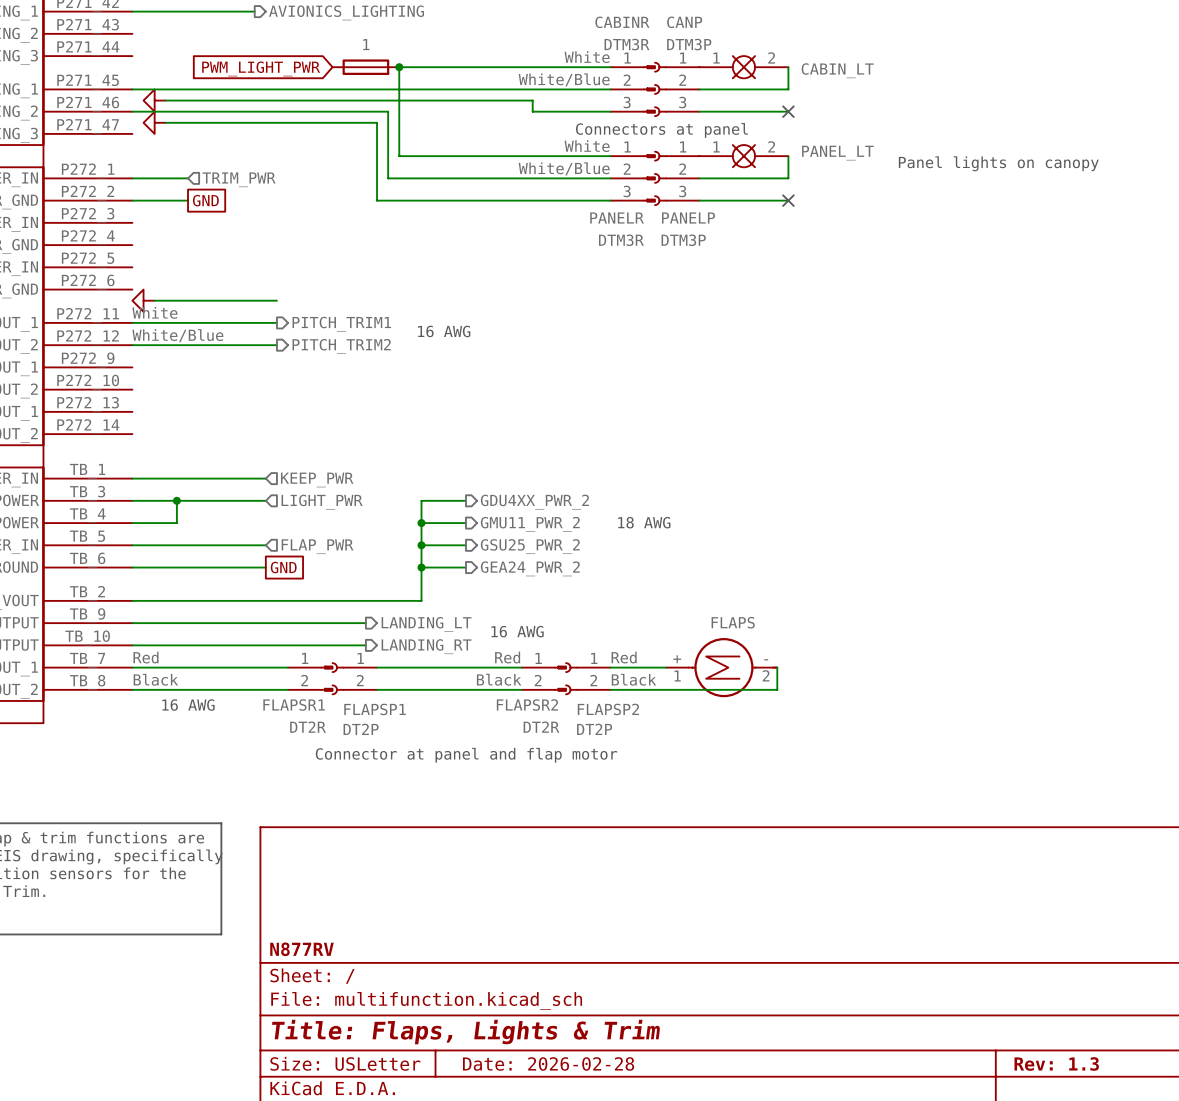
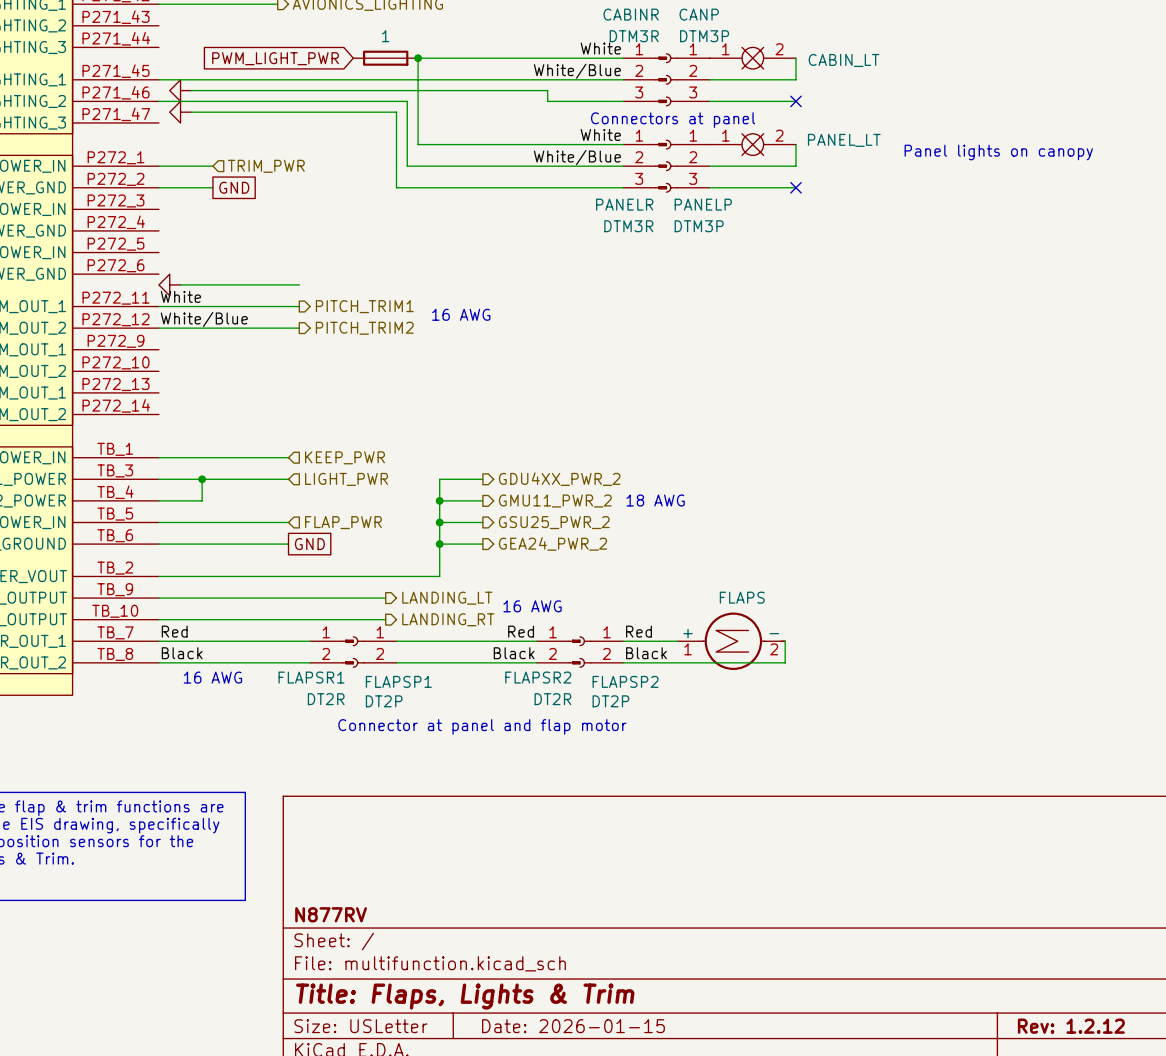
title block: Date: 2026-02-28 (548, 1063) -> Date: 2026-01-15 (573, 1026)
title block: Rev: 1.3 (1056, 1063) -> Rev: 1.2.12 (1071, 1026)

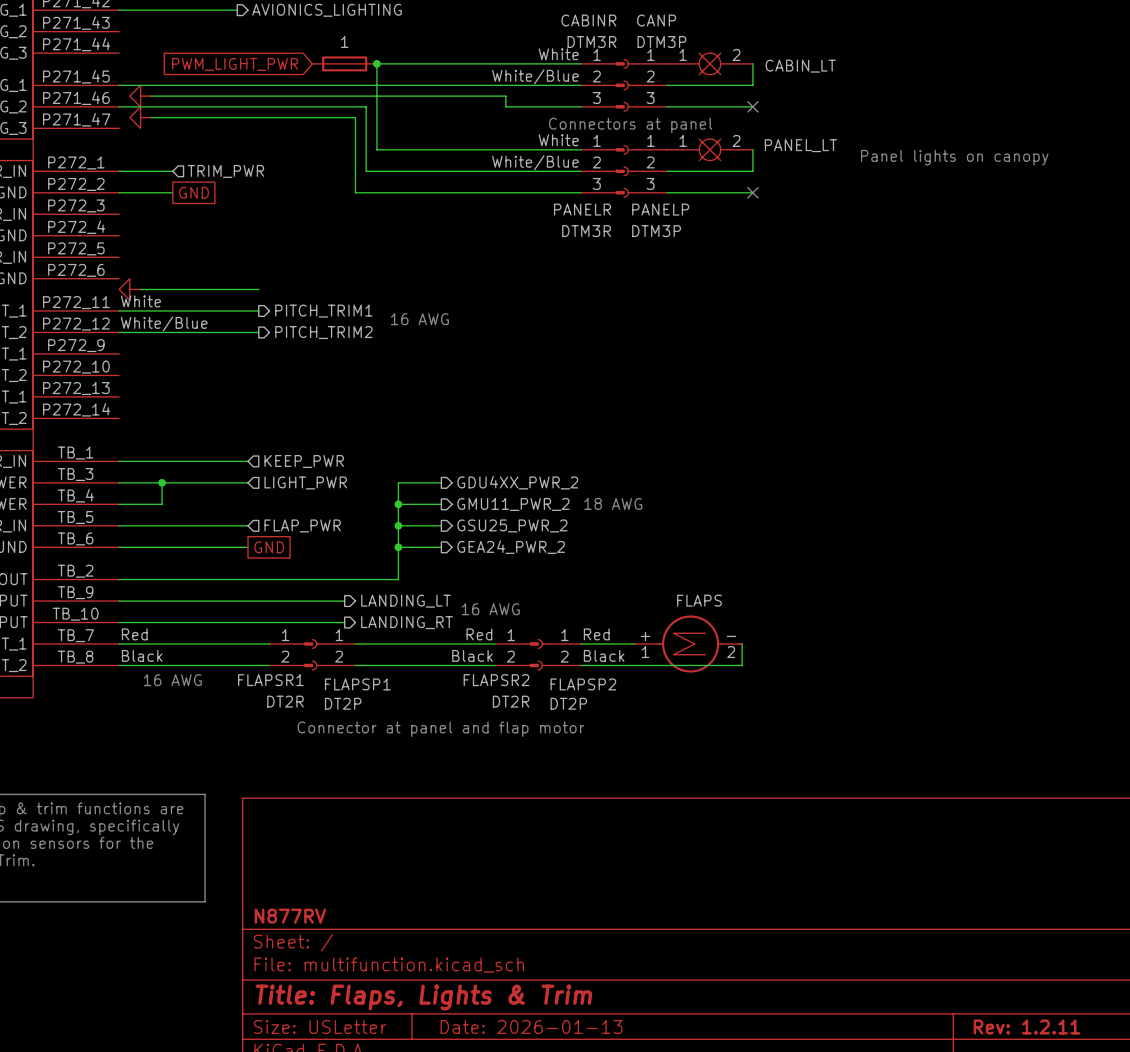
title block: Date: 2026-01-15 (573, 1026) -> Date: 2026-01-13 (531, 1026)
title block: Rev: 1.2.12 (1071, 1026) -> Rev: 1.2.11 (1026, 1026)

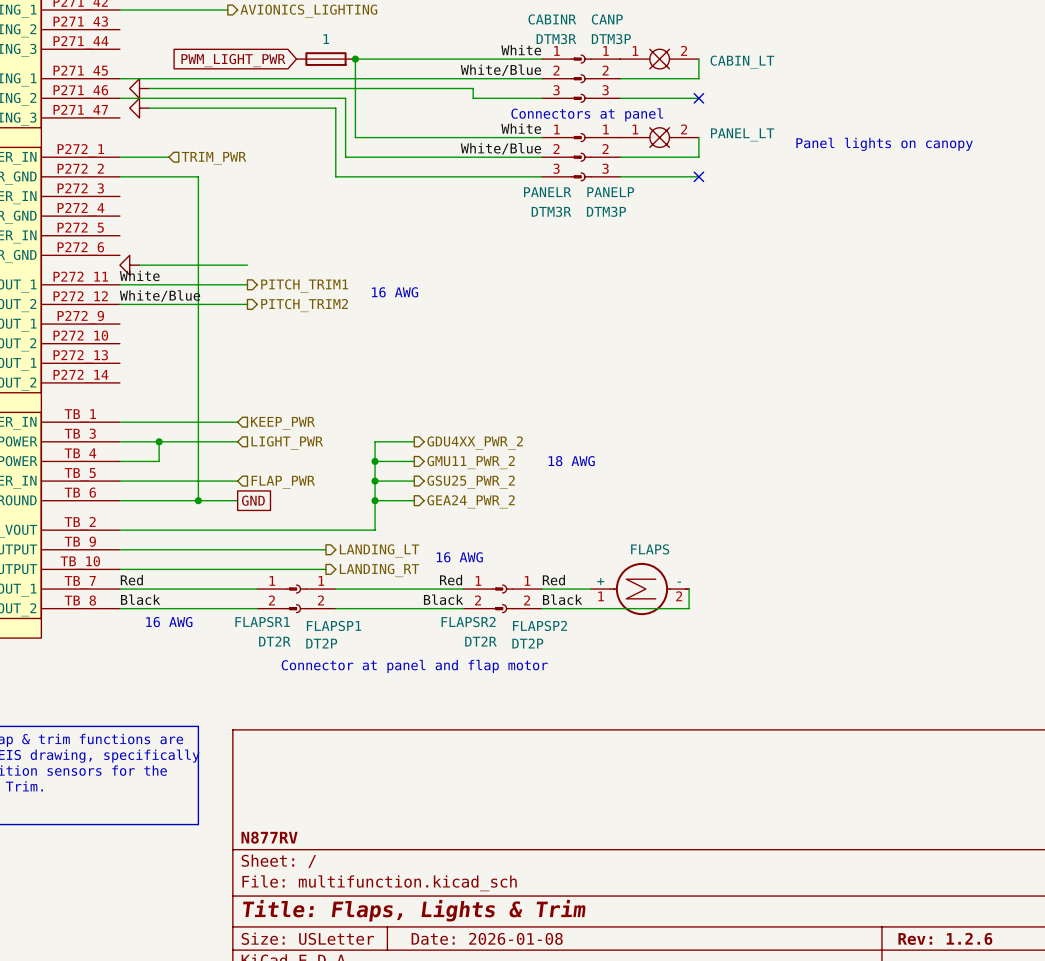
wire: none -> (168, 176) (198, 176) (198, 500)
global label: GND (194, 192) -> none
junction: none -> (198, 500)
title block: Date: 2026-01-13 (531, 1026) -> Date: 2026-01-08 (487, 938)
title block: Rev: 1.2.11 (1026, 1026) -> Rev: 1.2.6 (945, 938)

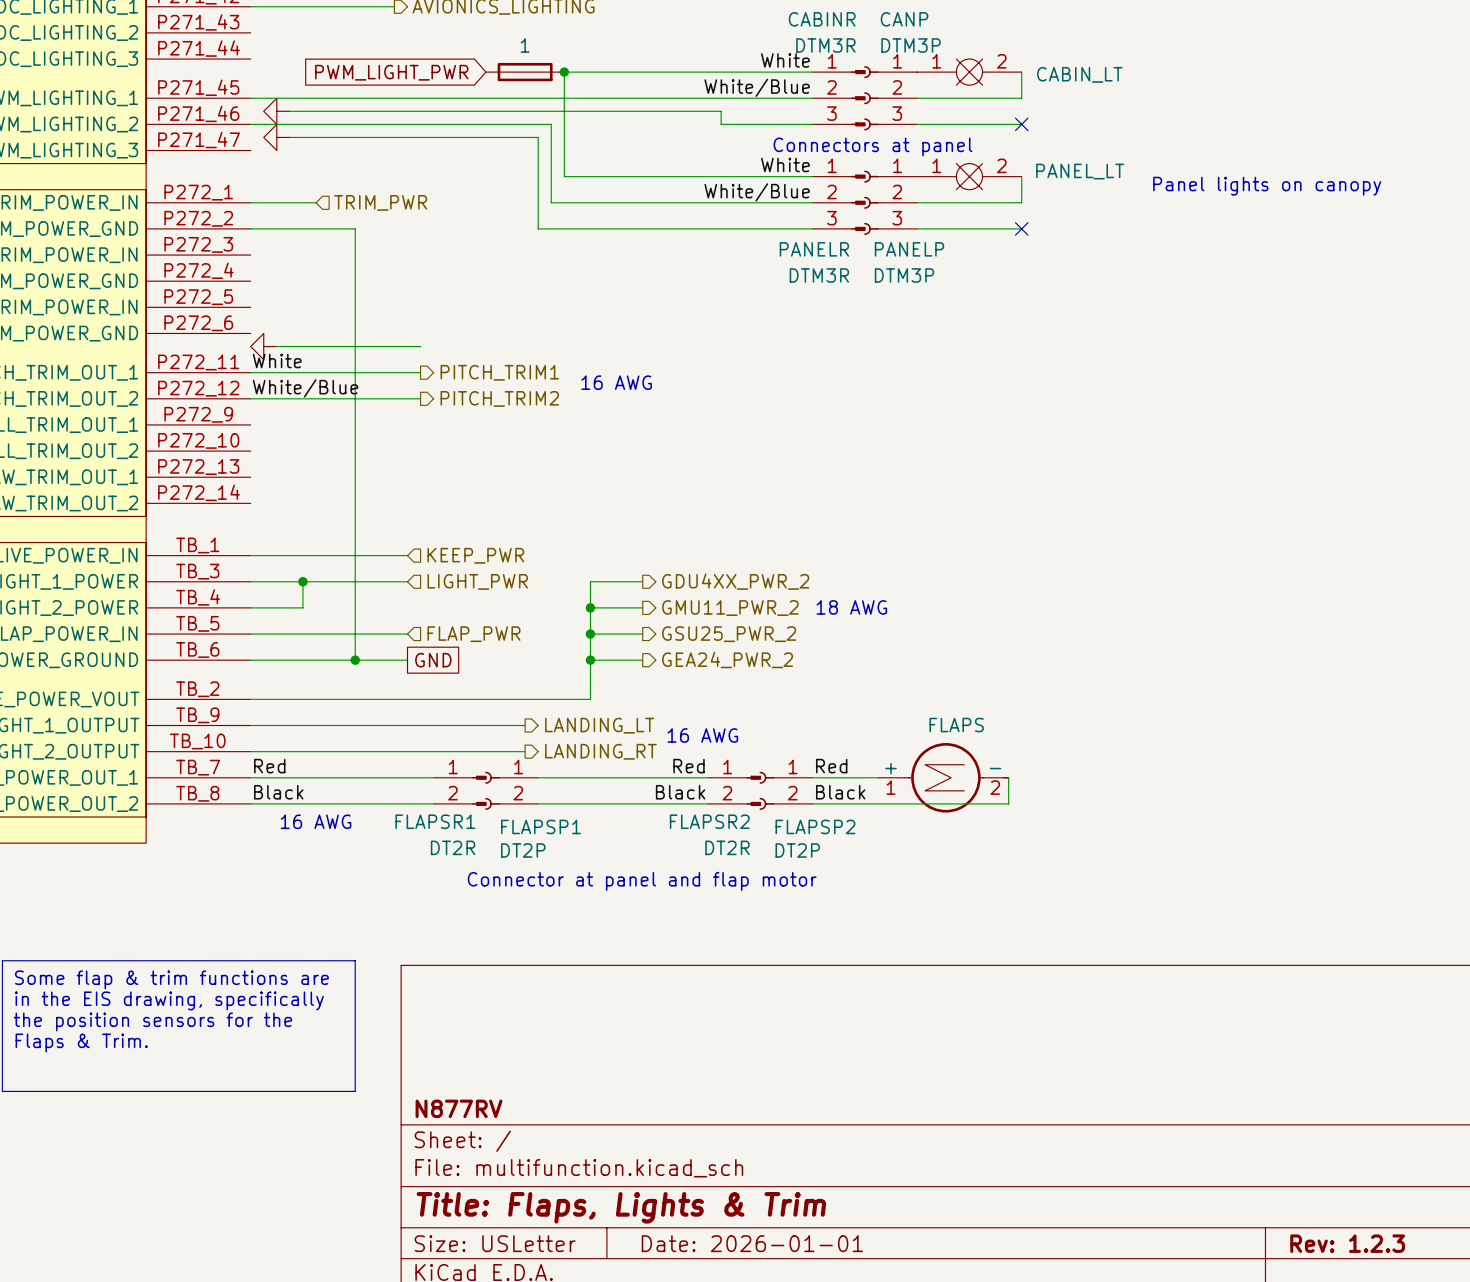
title block: Date: 2026-01-08 (487, 938) -> Date: 2026-01-01 (752, 1243)
title block: Rev: 1.2.6 (945, 938) -> Rev: 1.2.3 (1347, 1243)

